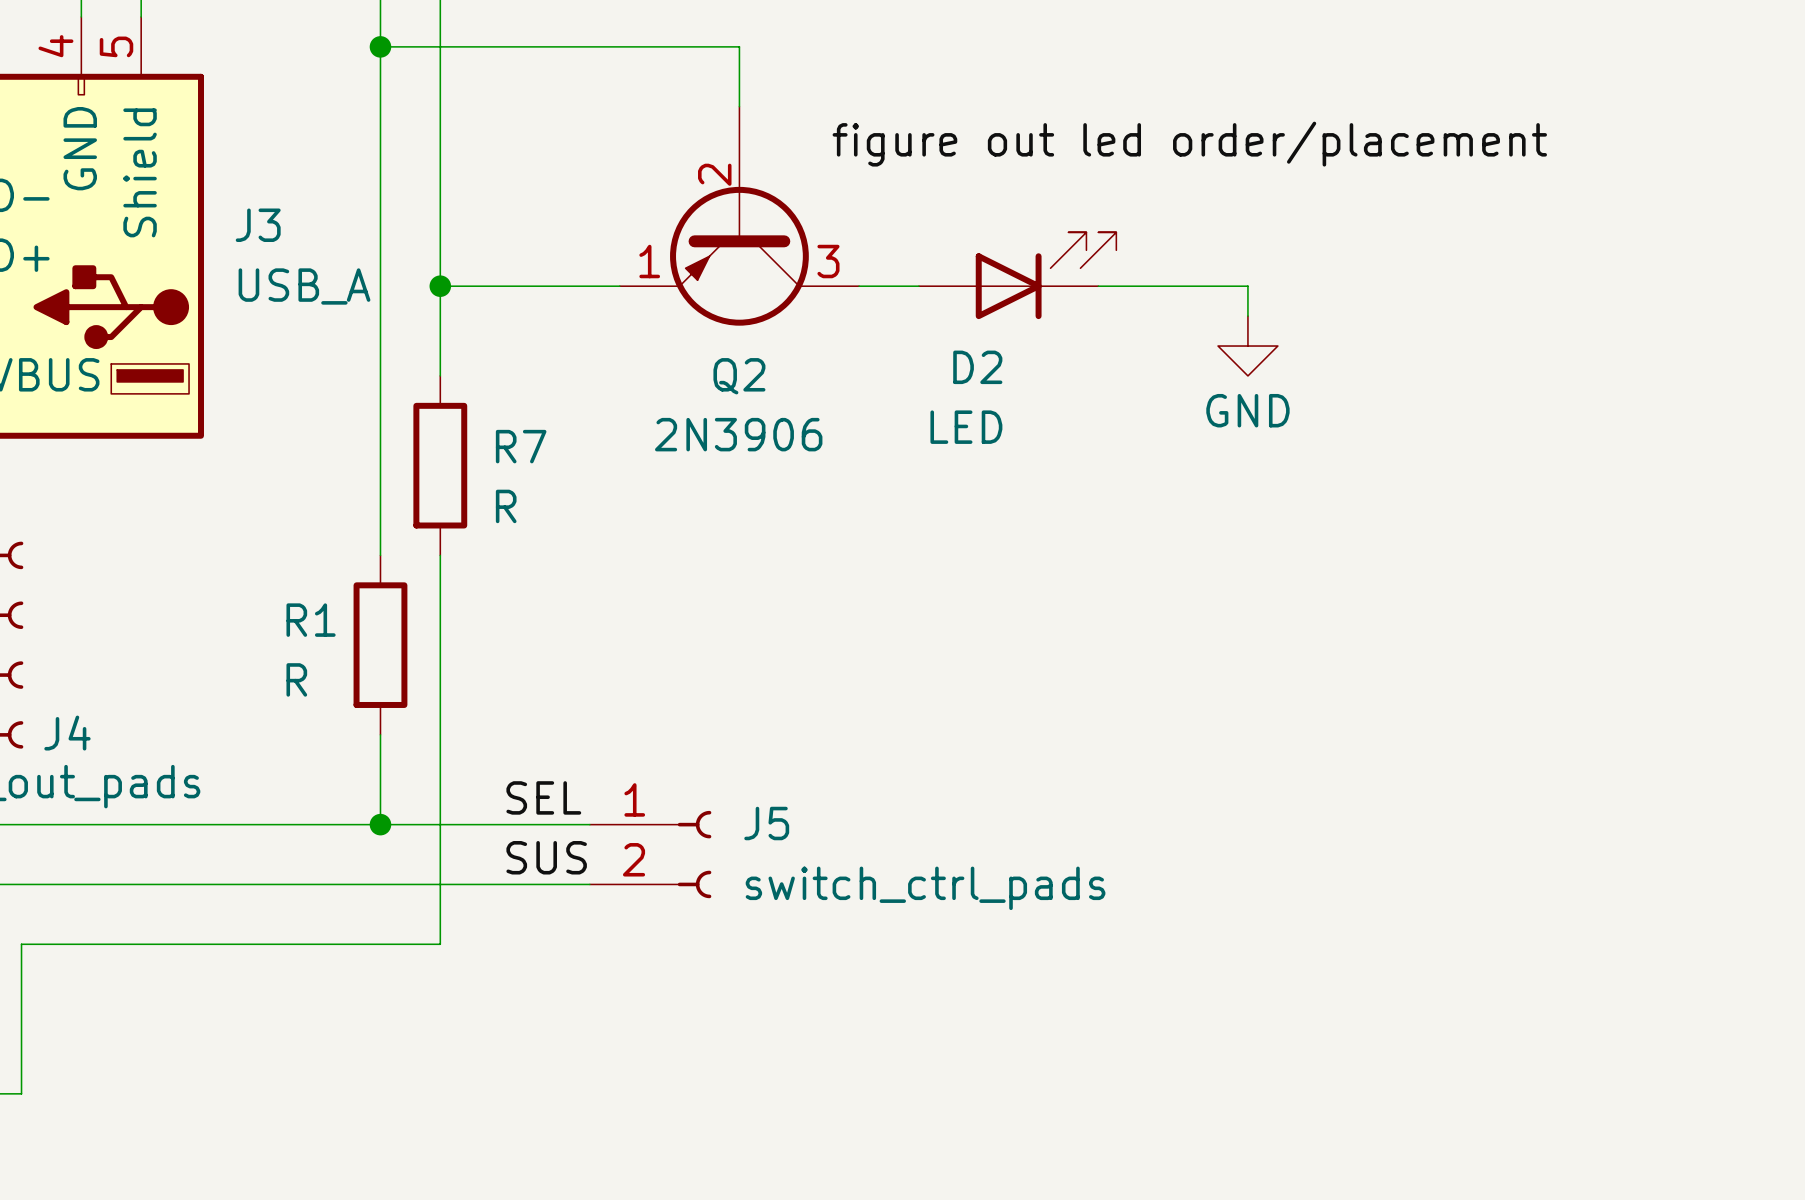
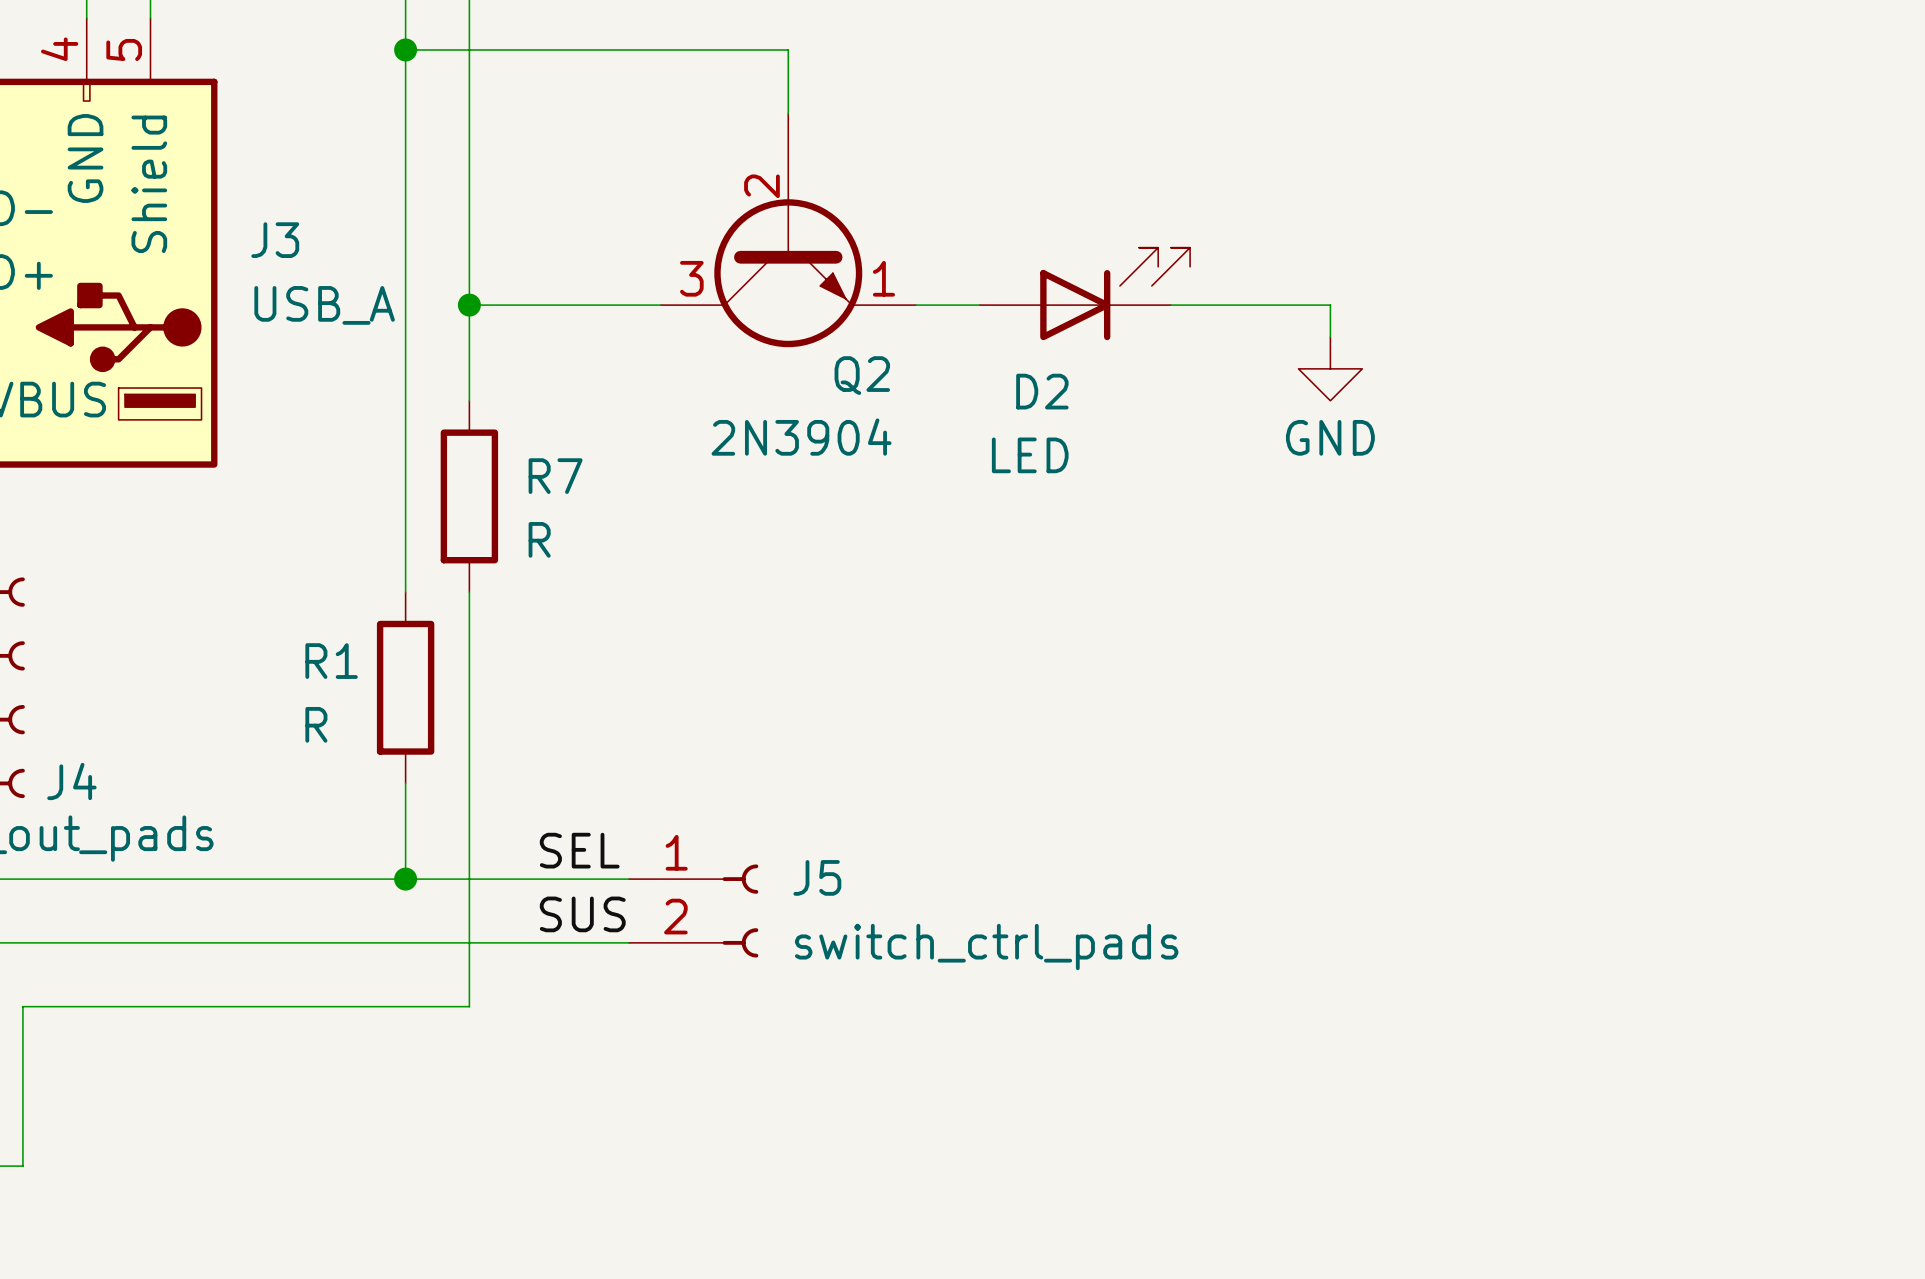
Q2 symbol: [619, 106, 860, 326] -> [660, 113, 916, 348]
label: figure out led order/placement (1189, 144) -> none
Q2 name position: Q2 (739, 376) -> Q2 (862, 375)
Q2 value: 2N3906 (738, 434) -> 2N3904 (801, 437)

